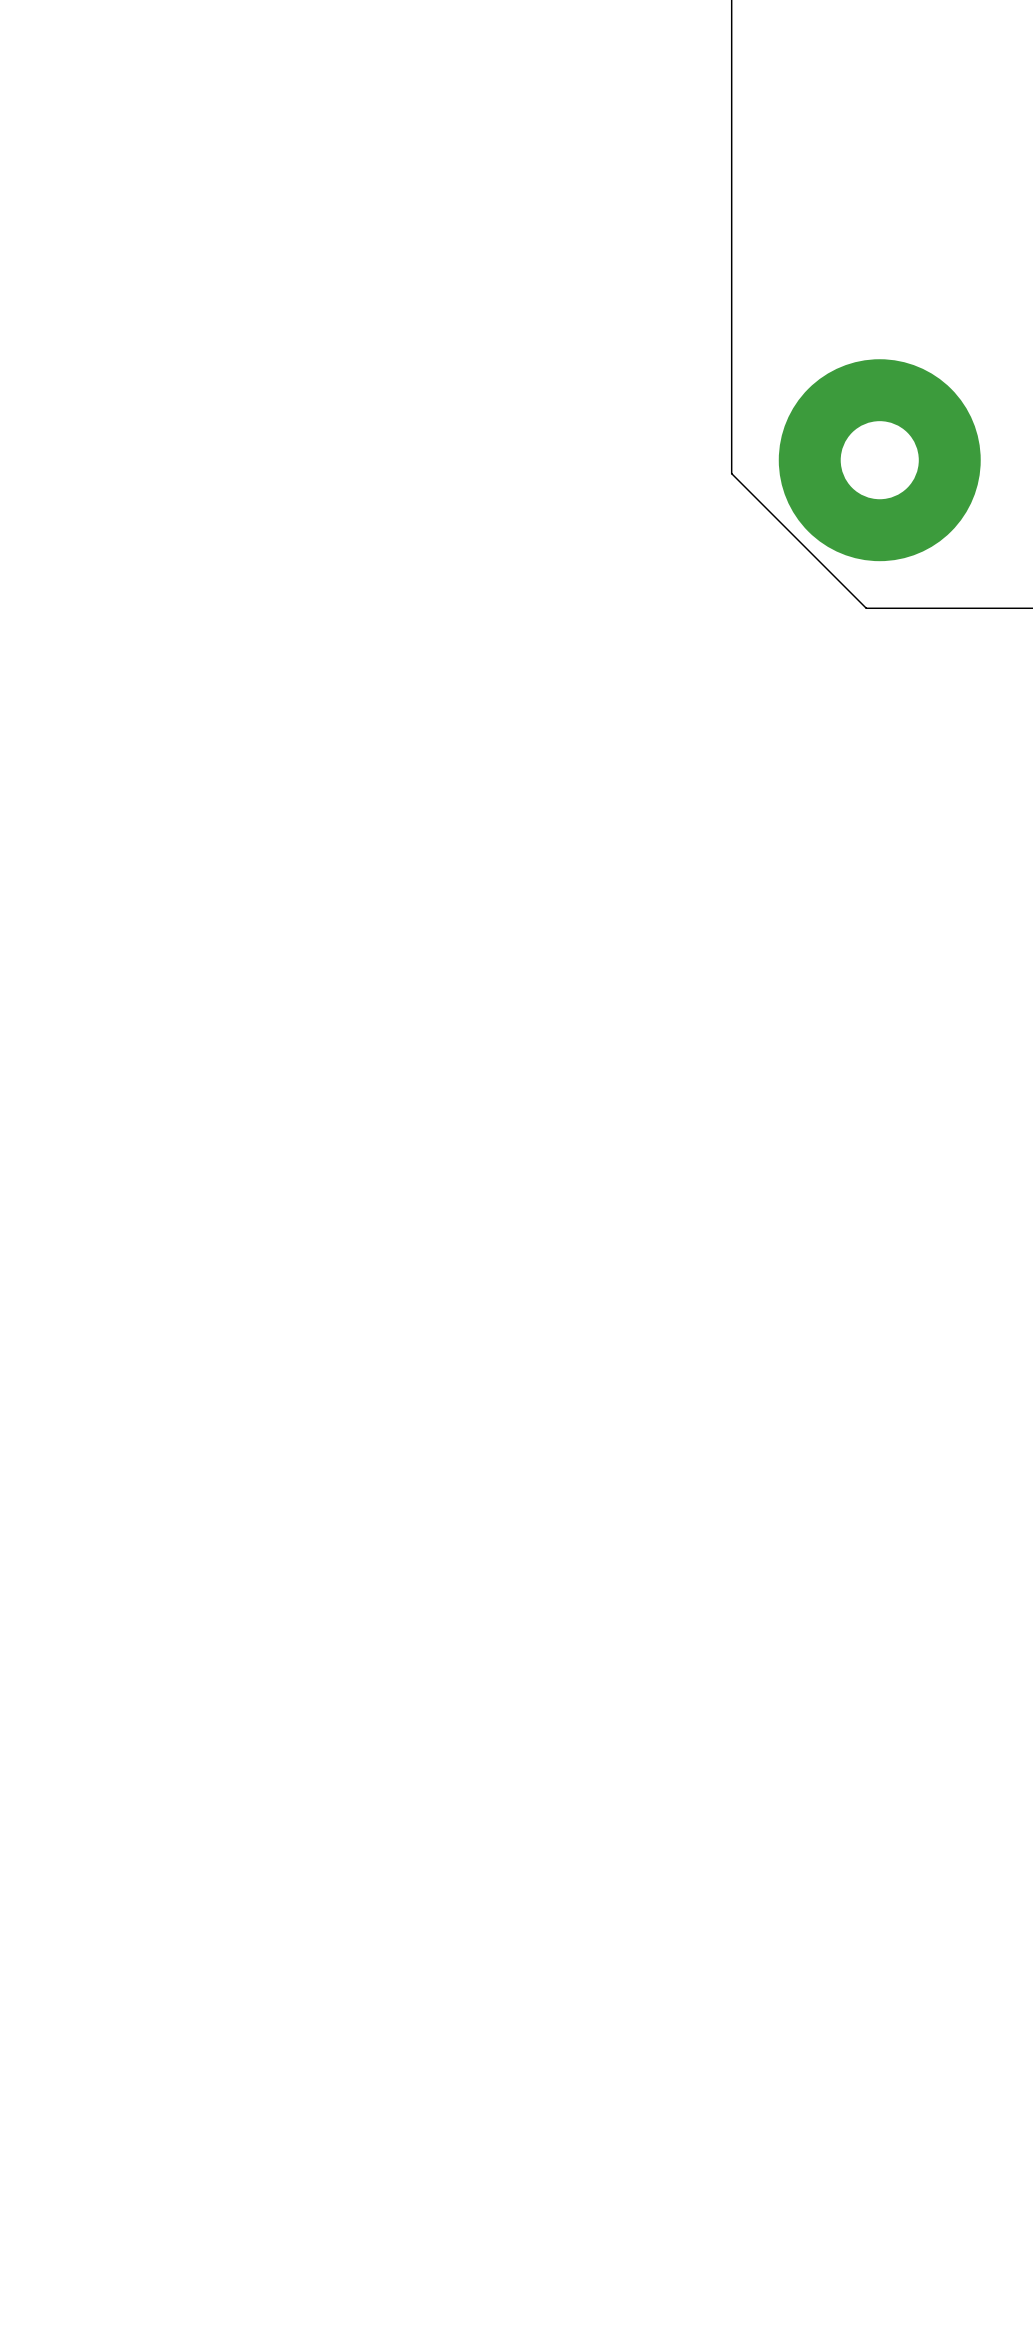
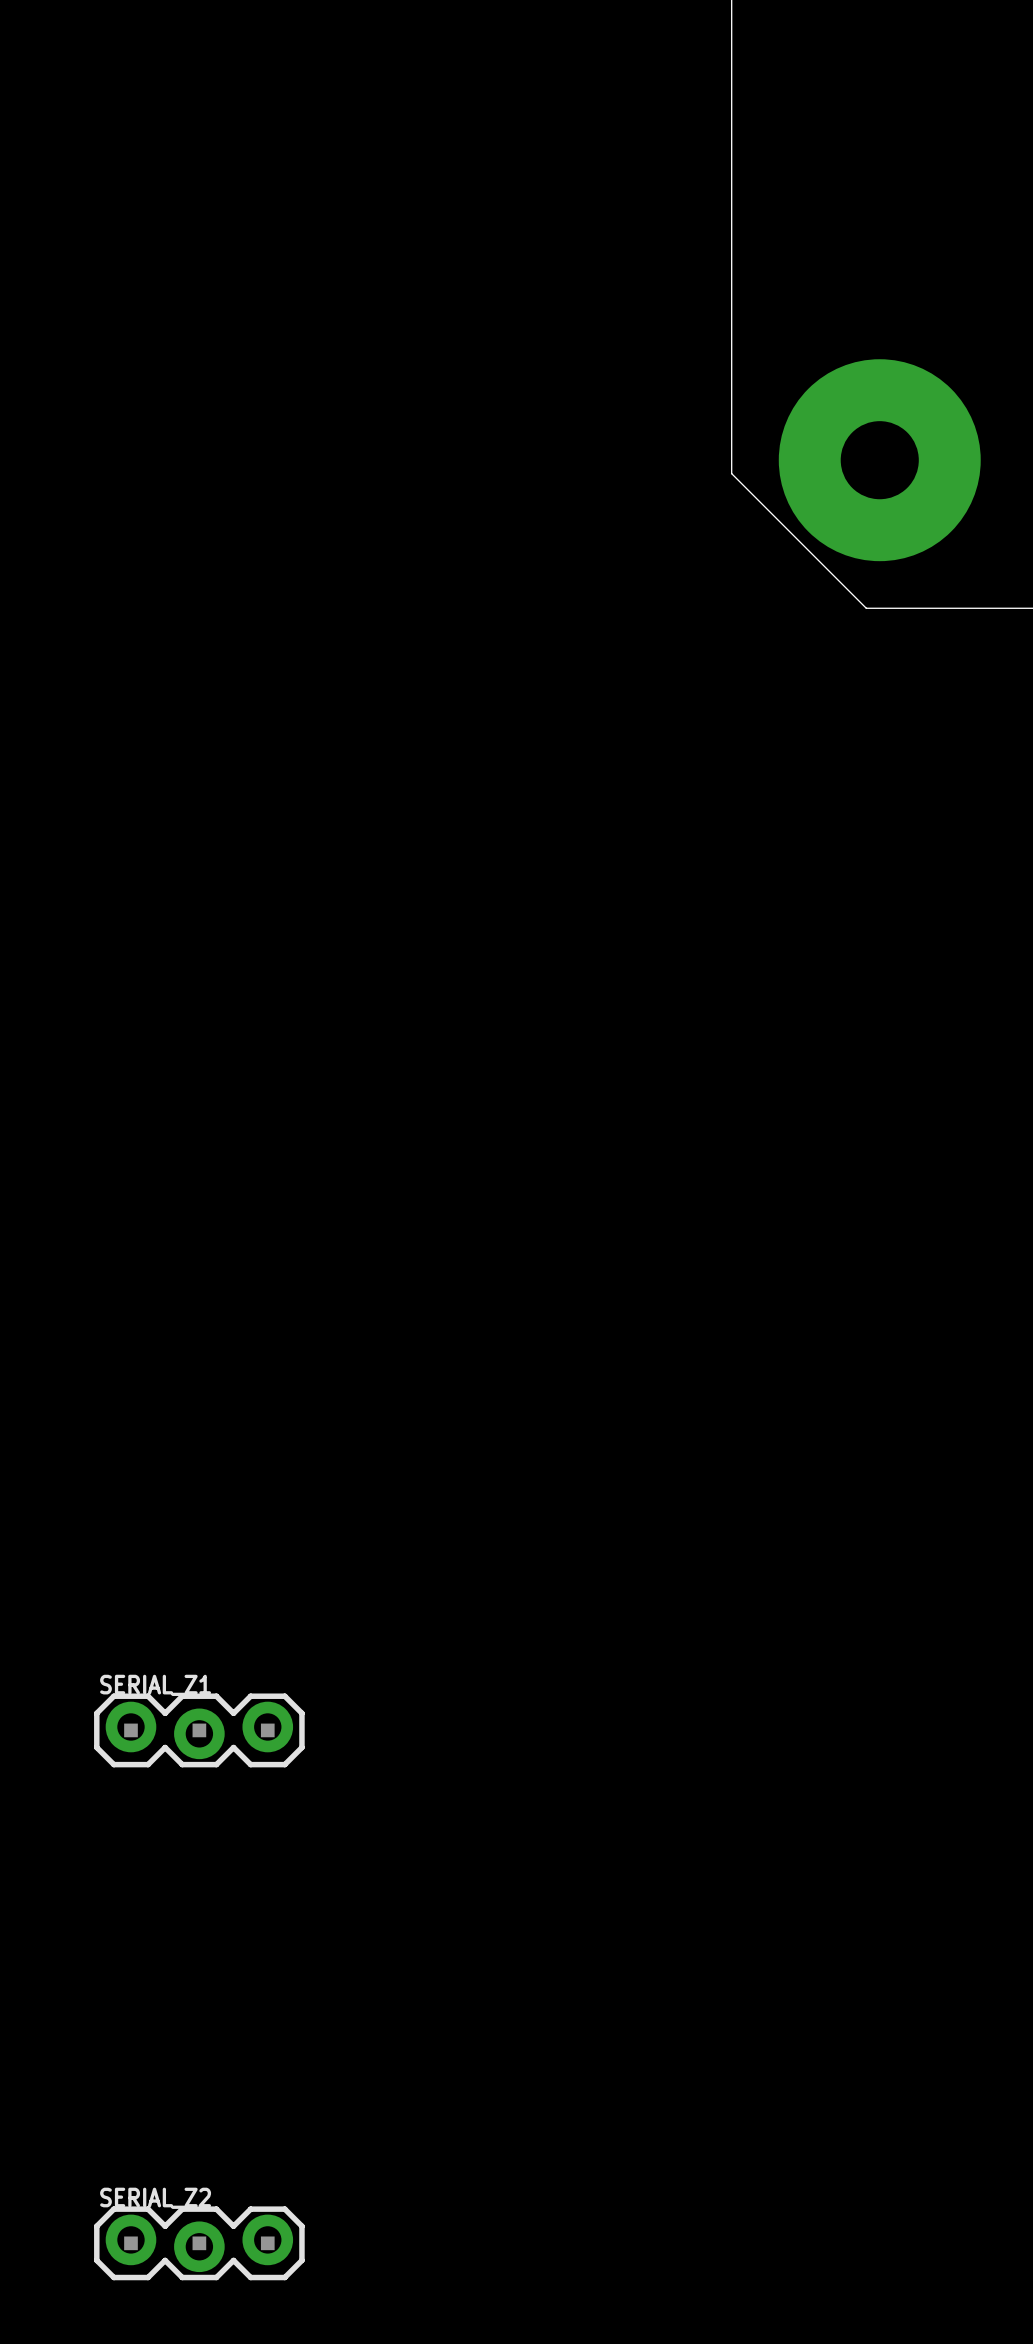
SERIAL_Z1: none -> (199, 1730)
SERIAL_Z2: none -> (199, 2243)

